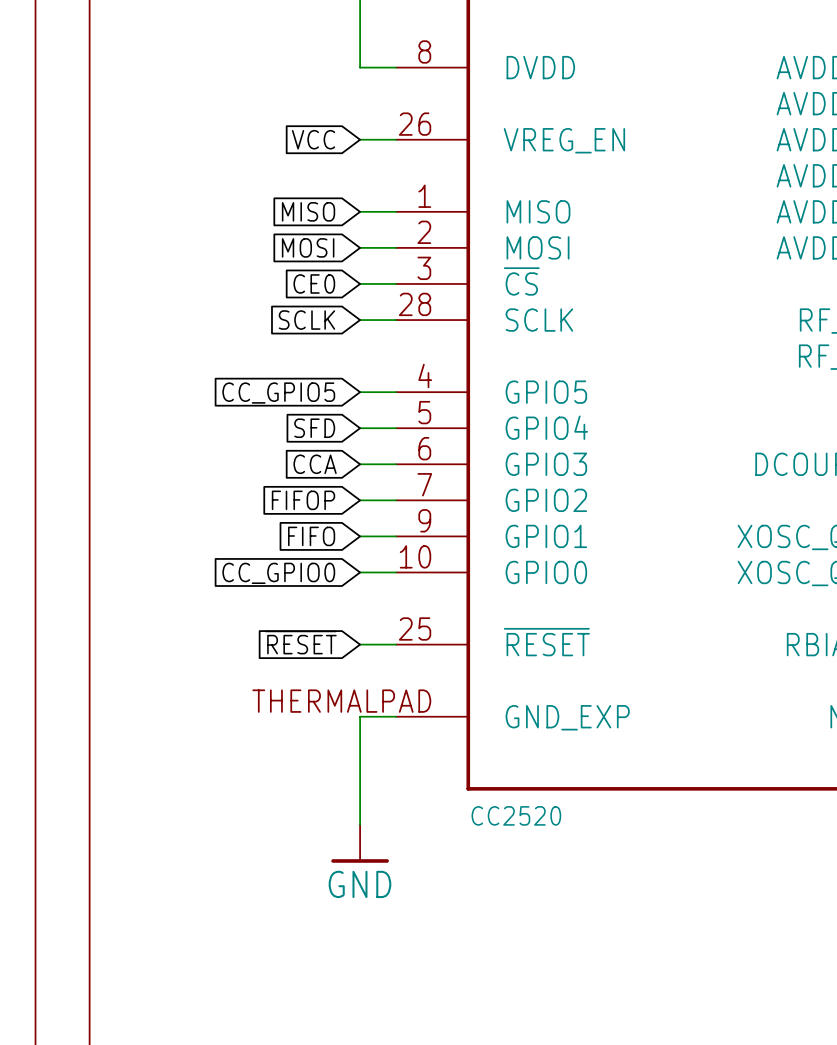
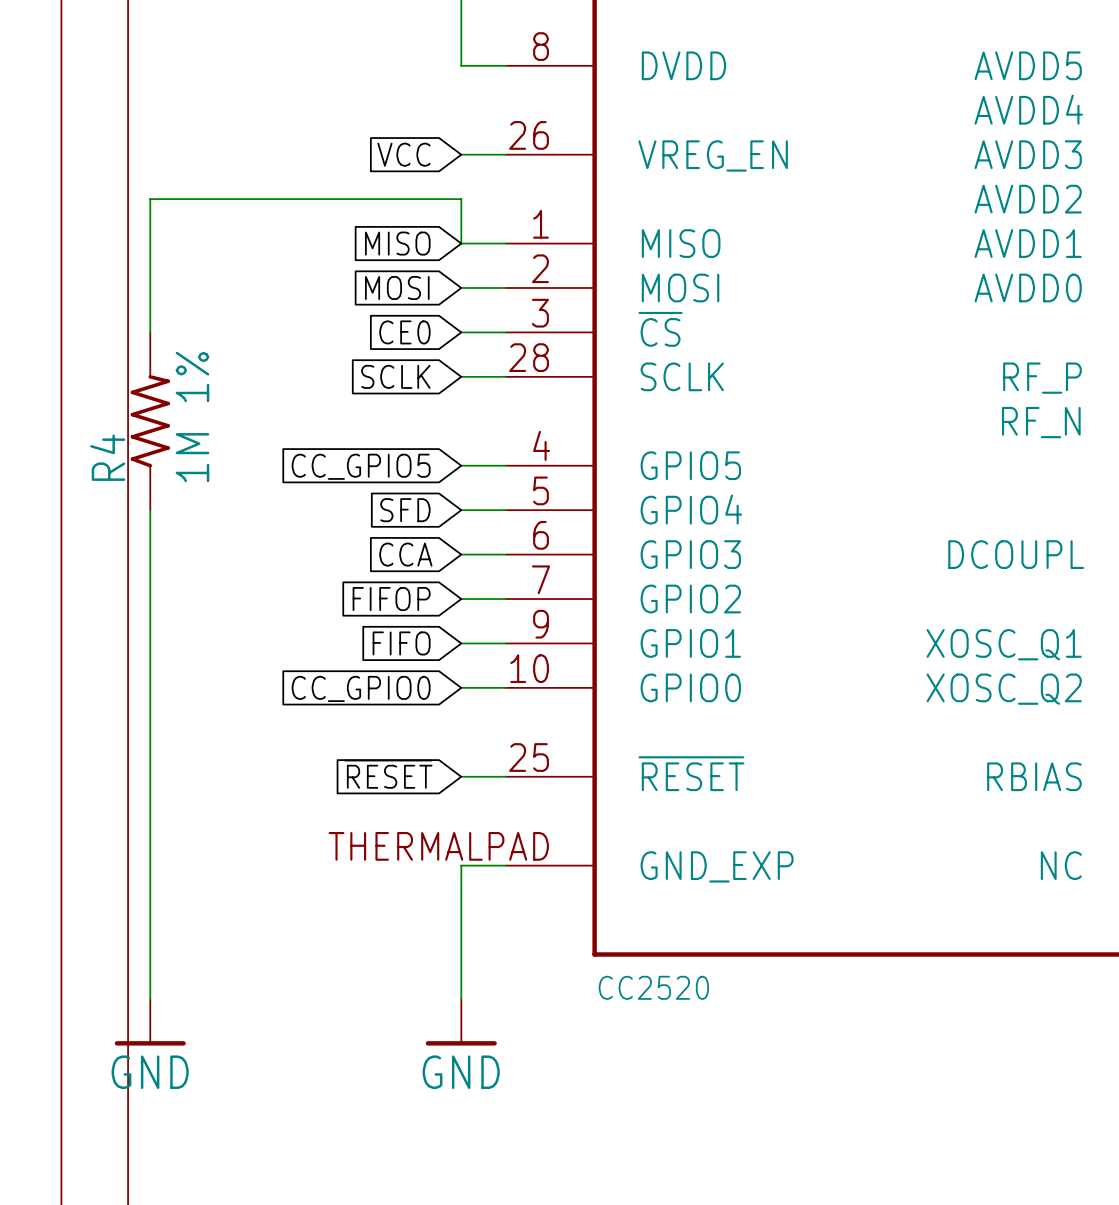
wire: none -> (461, 243) (461, 199) (150, 199) (150, 332)
R4: none -> 1M 1% (150, 421)
wire: none -> (150, 510) (150, 998)
power symbol: none -> GND (150, 1022)

